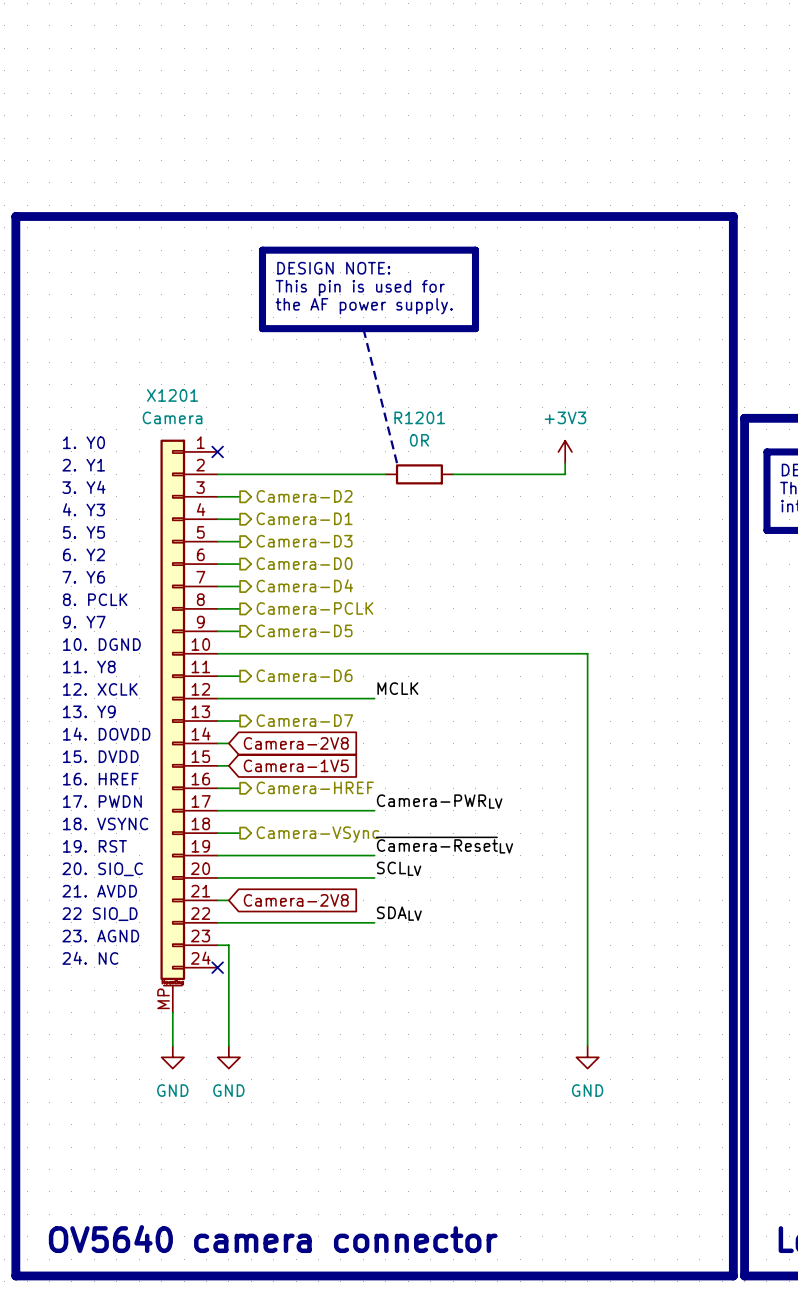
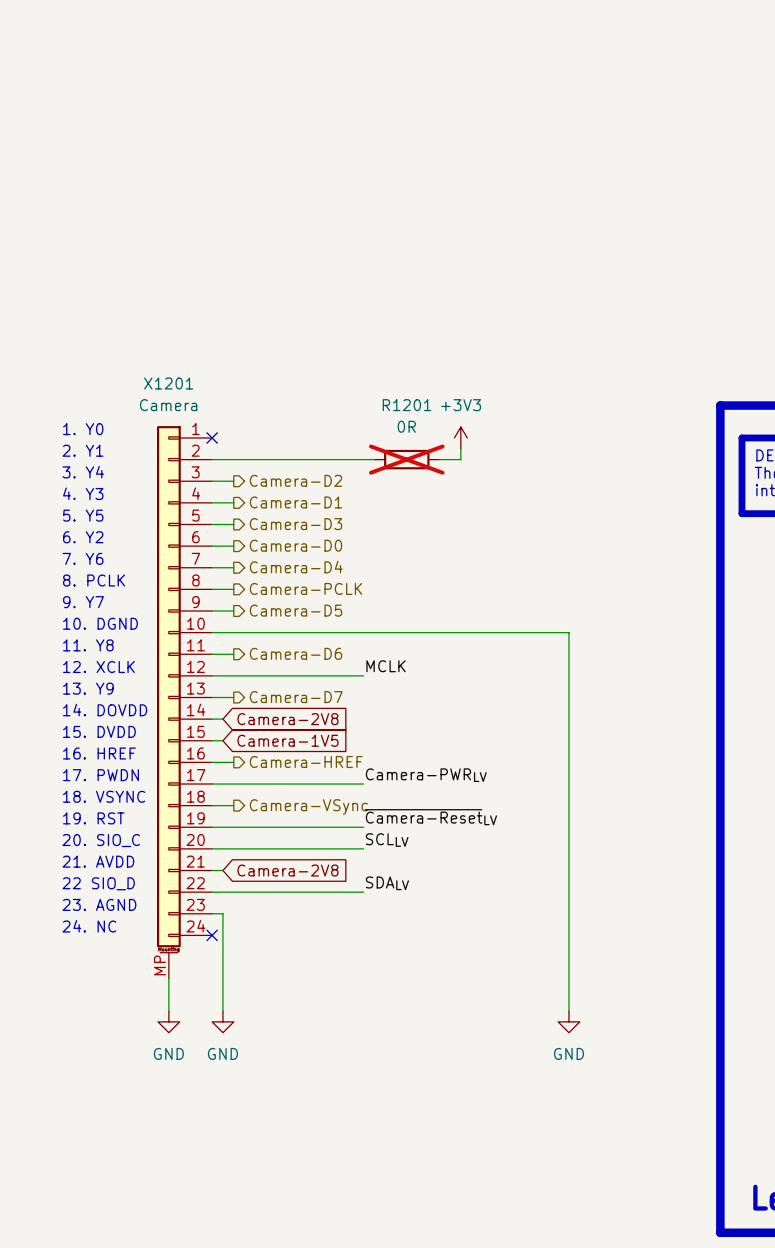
line: (15, 216) (733, 216) (733, 1275) (15, 1275) (15, 216) -> none
line: (262, 250) (475, 250) (475, 328) (262, 328) (262, 250) -> none
text: DESIGN NOTE: (333, 268) -> none
text: This pin is used for (360, 288) -> none
text: the AF power supply. (364, 306) -> none
line: (363, 328) (397, 463) -> none
power symbol position: +3V3 (565, 451) -> +3V3 (460, 437)
wire: (565, 463) (565, 474) (475, 474) -> (460, 448) (460, 459)
R1201 do-not-place cross: none -> (406, 459)
text: OV5640 camera connector (273, 1239) -> none

